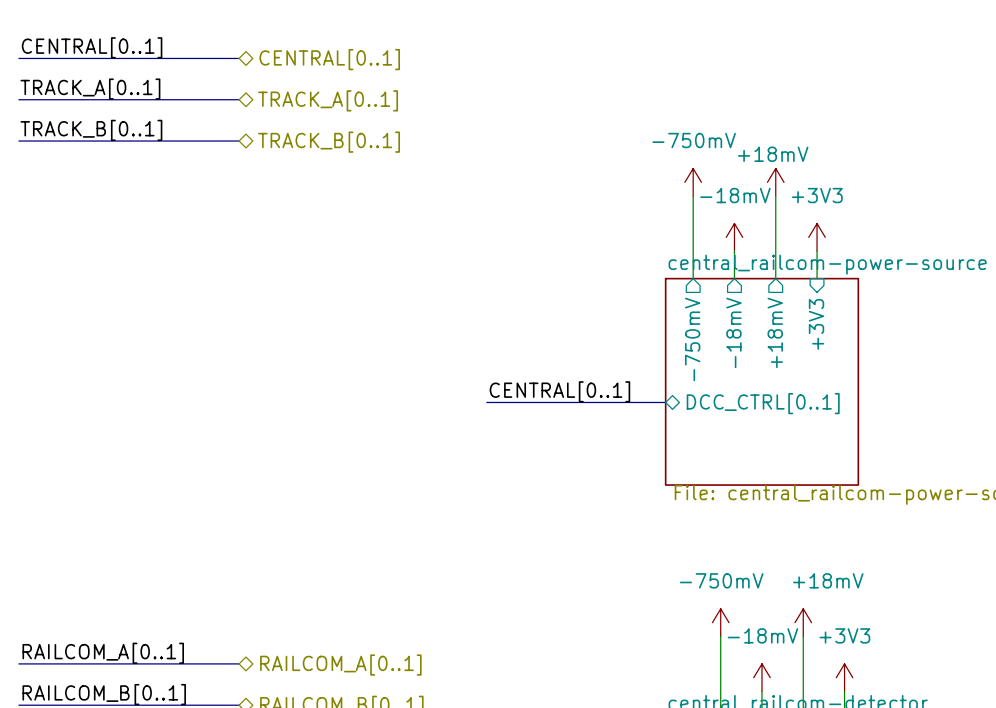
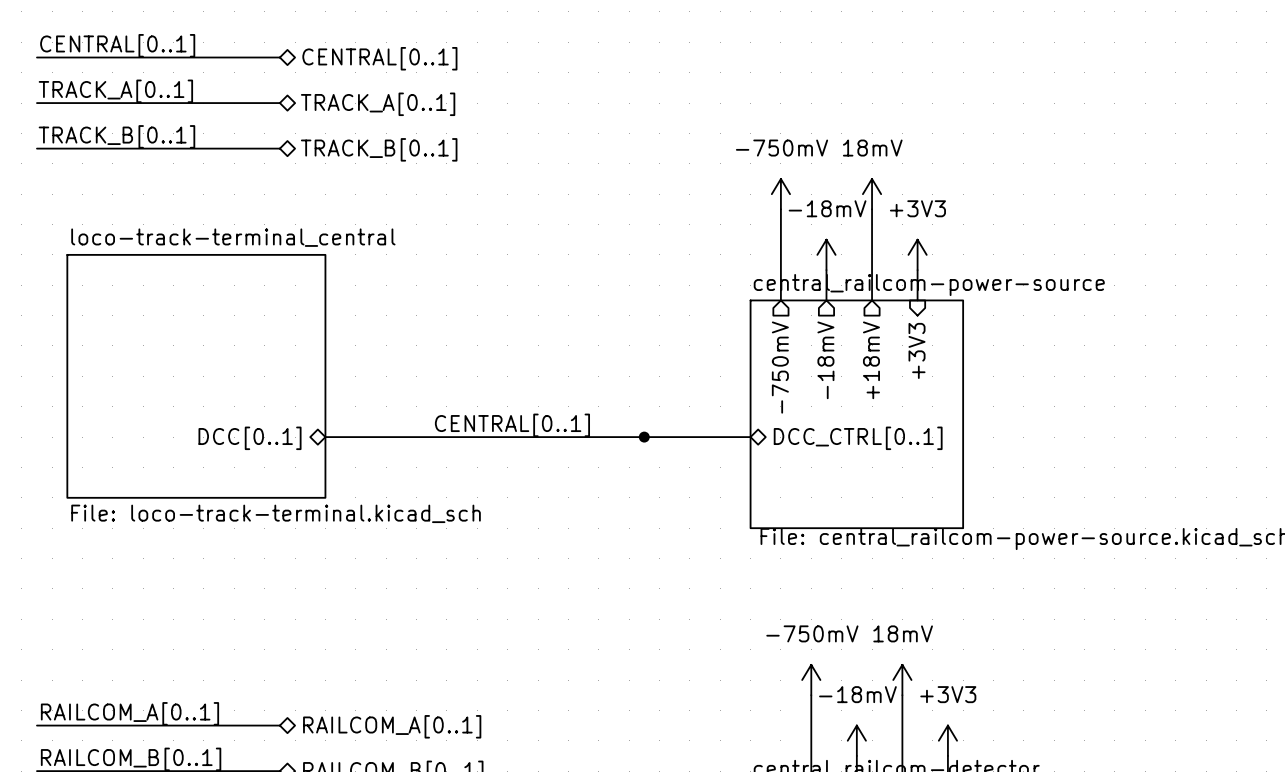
power symbol: +18mV (775, 182) -> 18mV (872, 194)
sheet loco-track-terminal_central: none -> File: loco-track-terminal.kicad_sch (196, 376)
label position: CENTRAL[0..1] (559, 391) -> CENTRAL[0..1] (512, 425)
bus: none -> (325, 437) (553, 437)
junction: none -> (644, 437)
sheet pin: none -> DCC[0..1] (250, 438)
power symbol: +18mV (803, 622) -> 18mV (902, 680)

